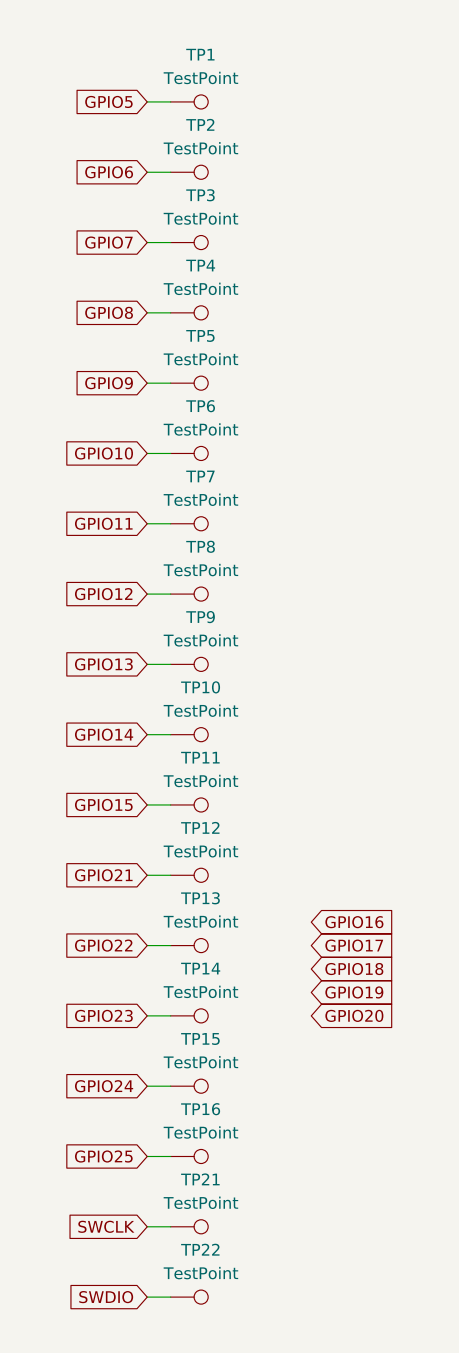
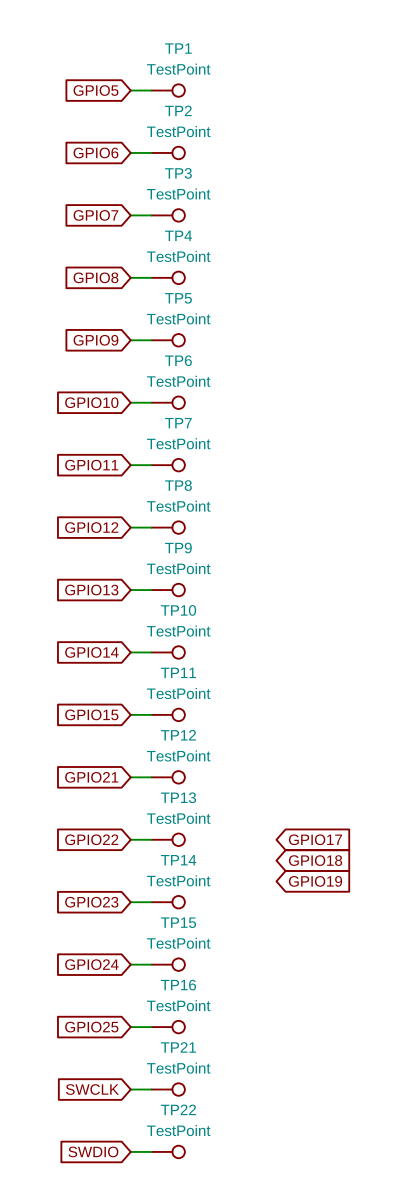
global label: GPIO16 (354, 922) -> none
global label: GPIO20 (354, 1015) -> none

